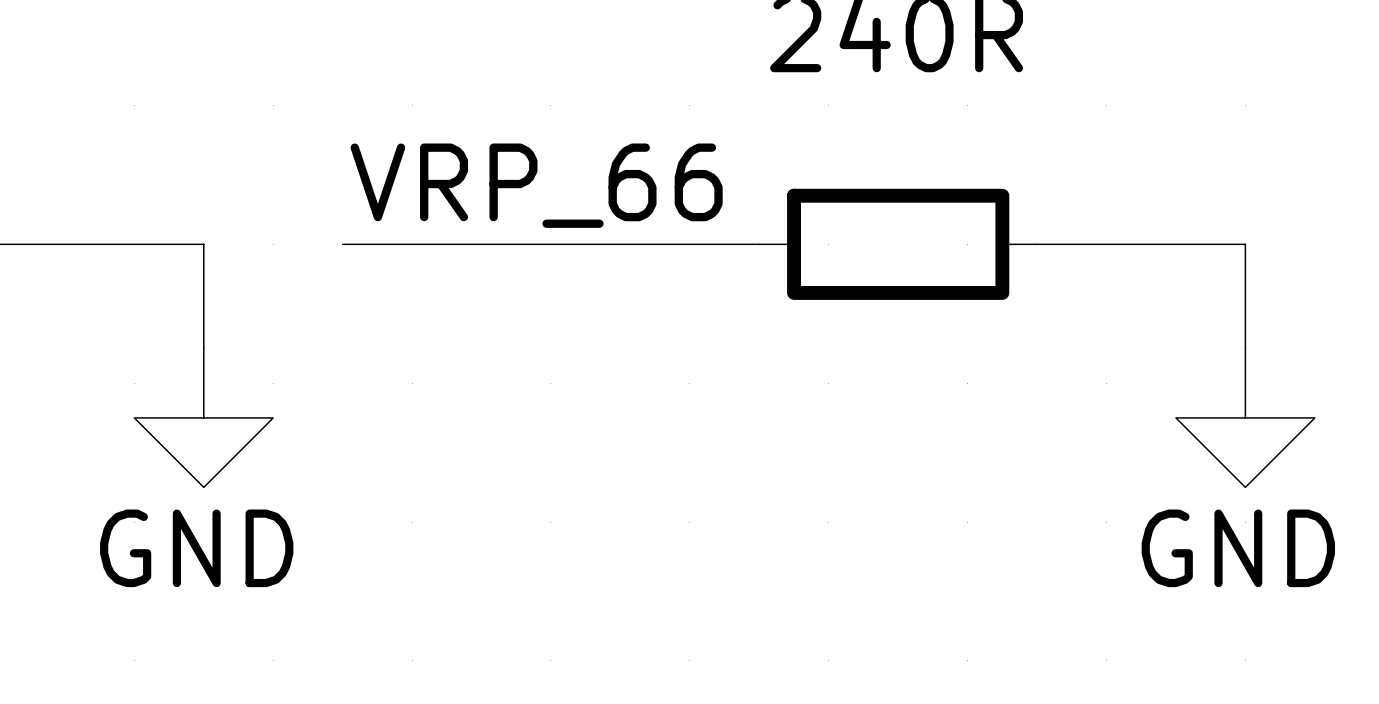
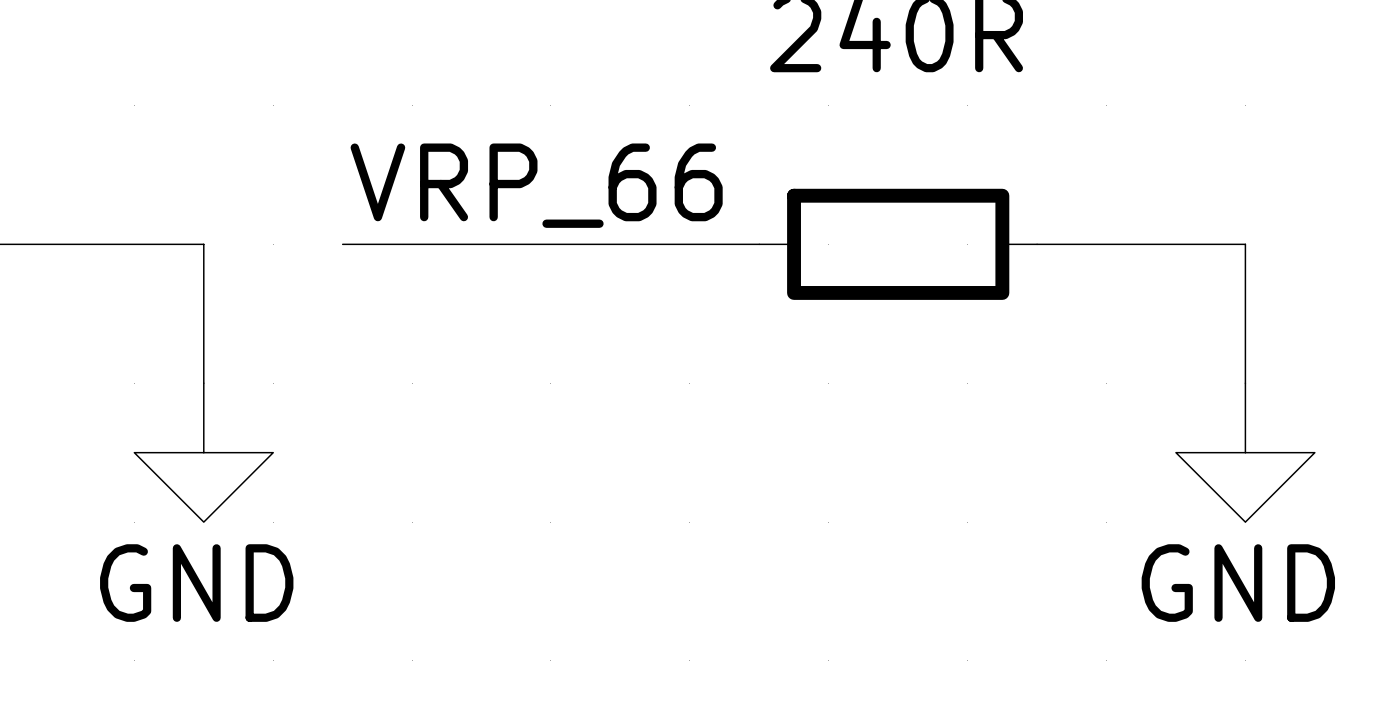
power symbol position: GND (203, 417) -> GND (203, 452)
power symbol position: GND (1245, 417) -> GND (1245, 452)

